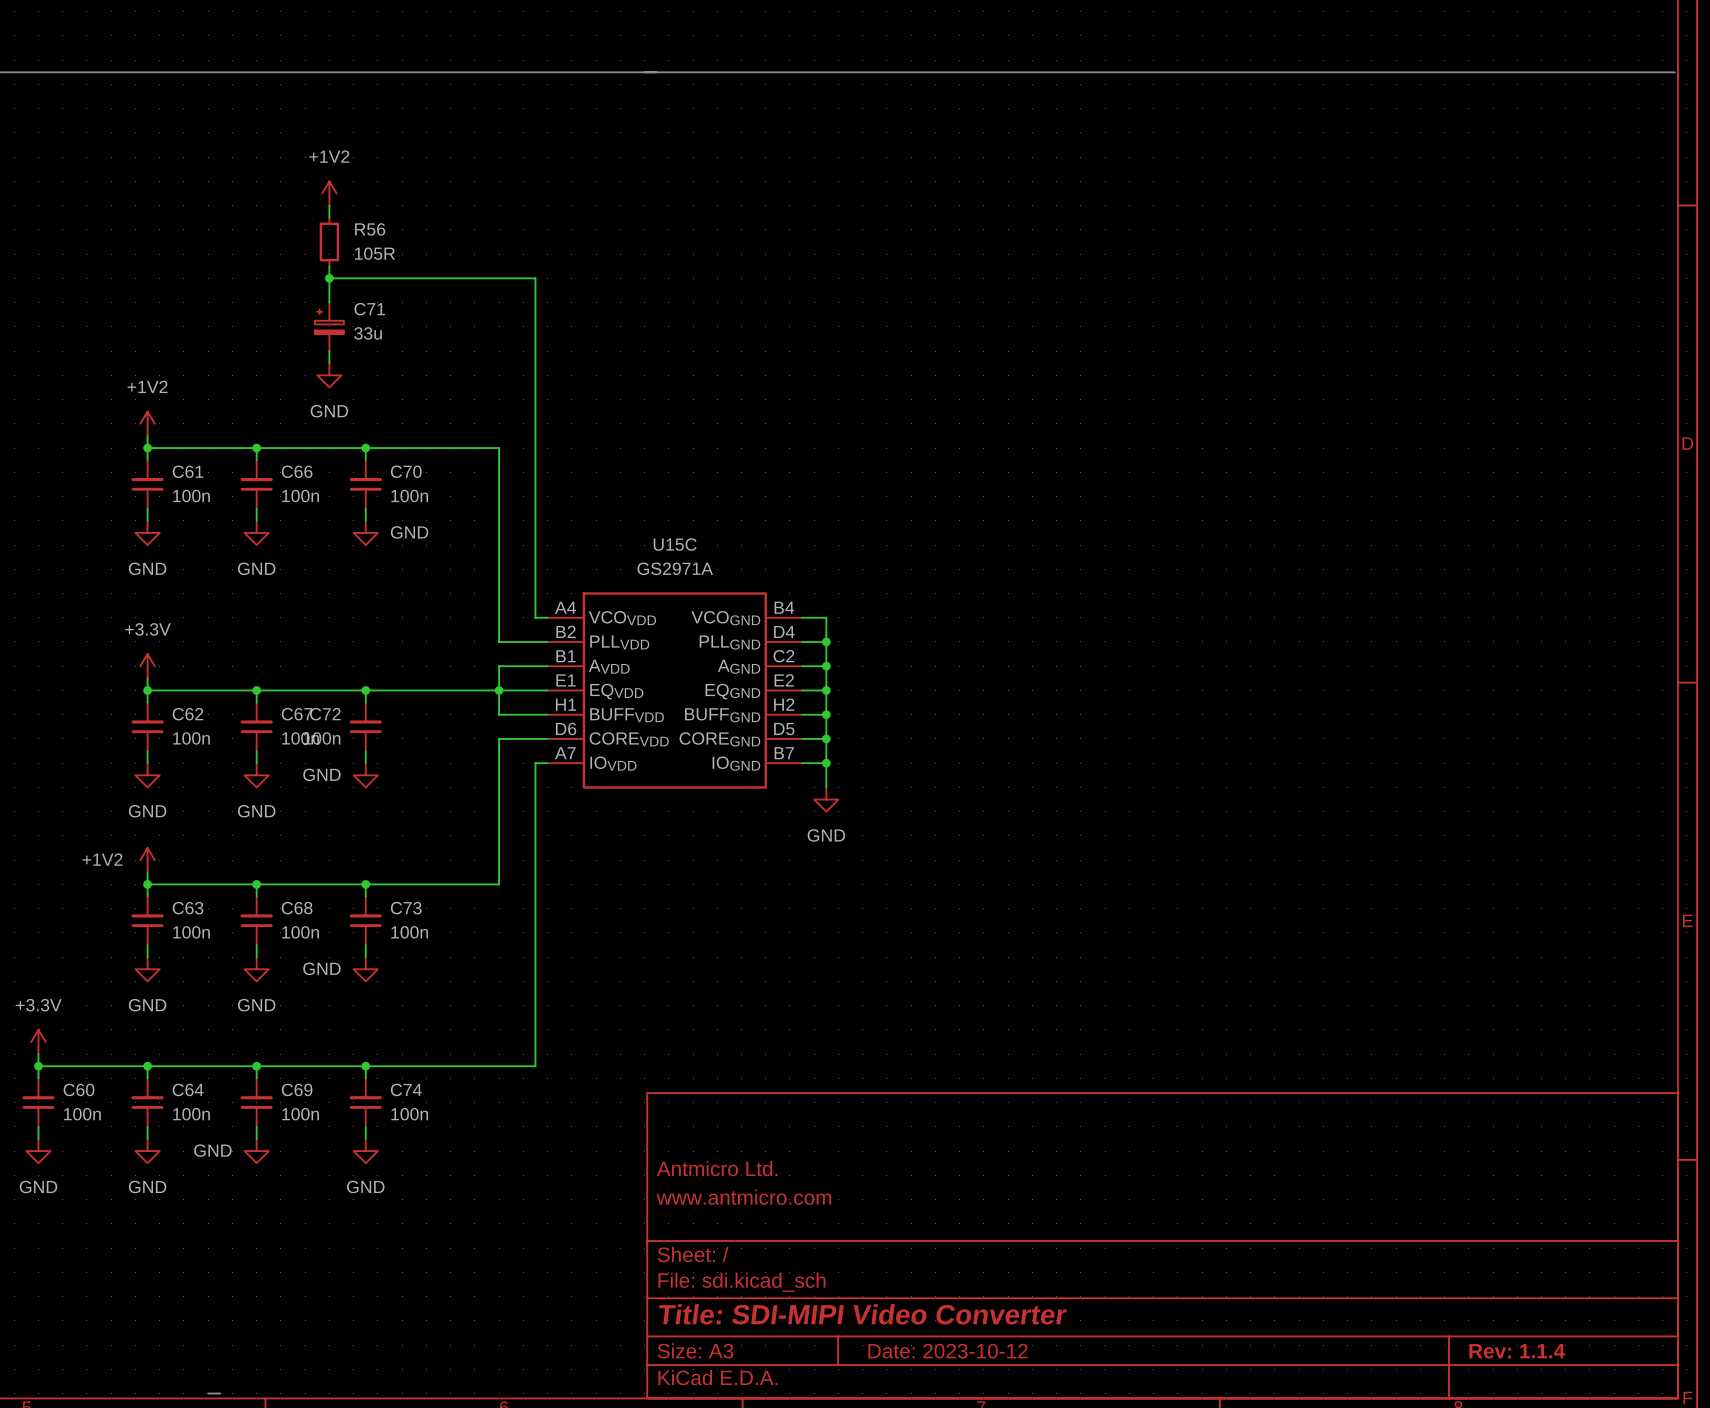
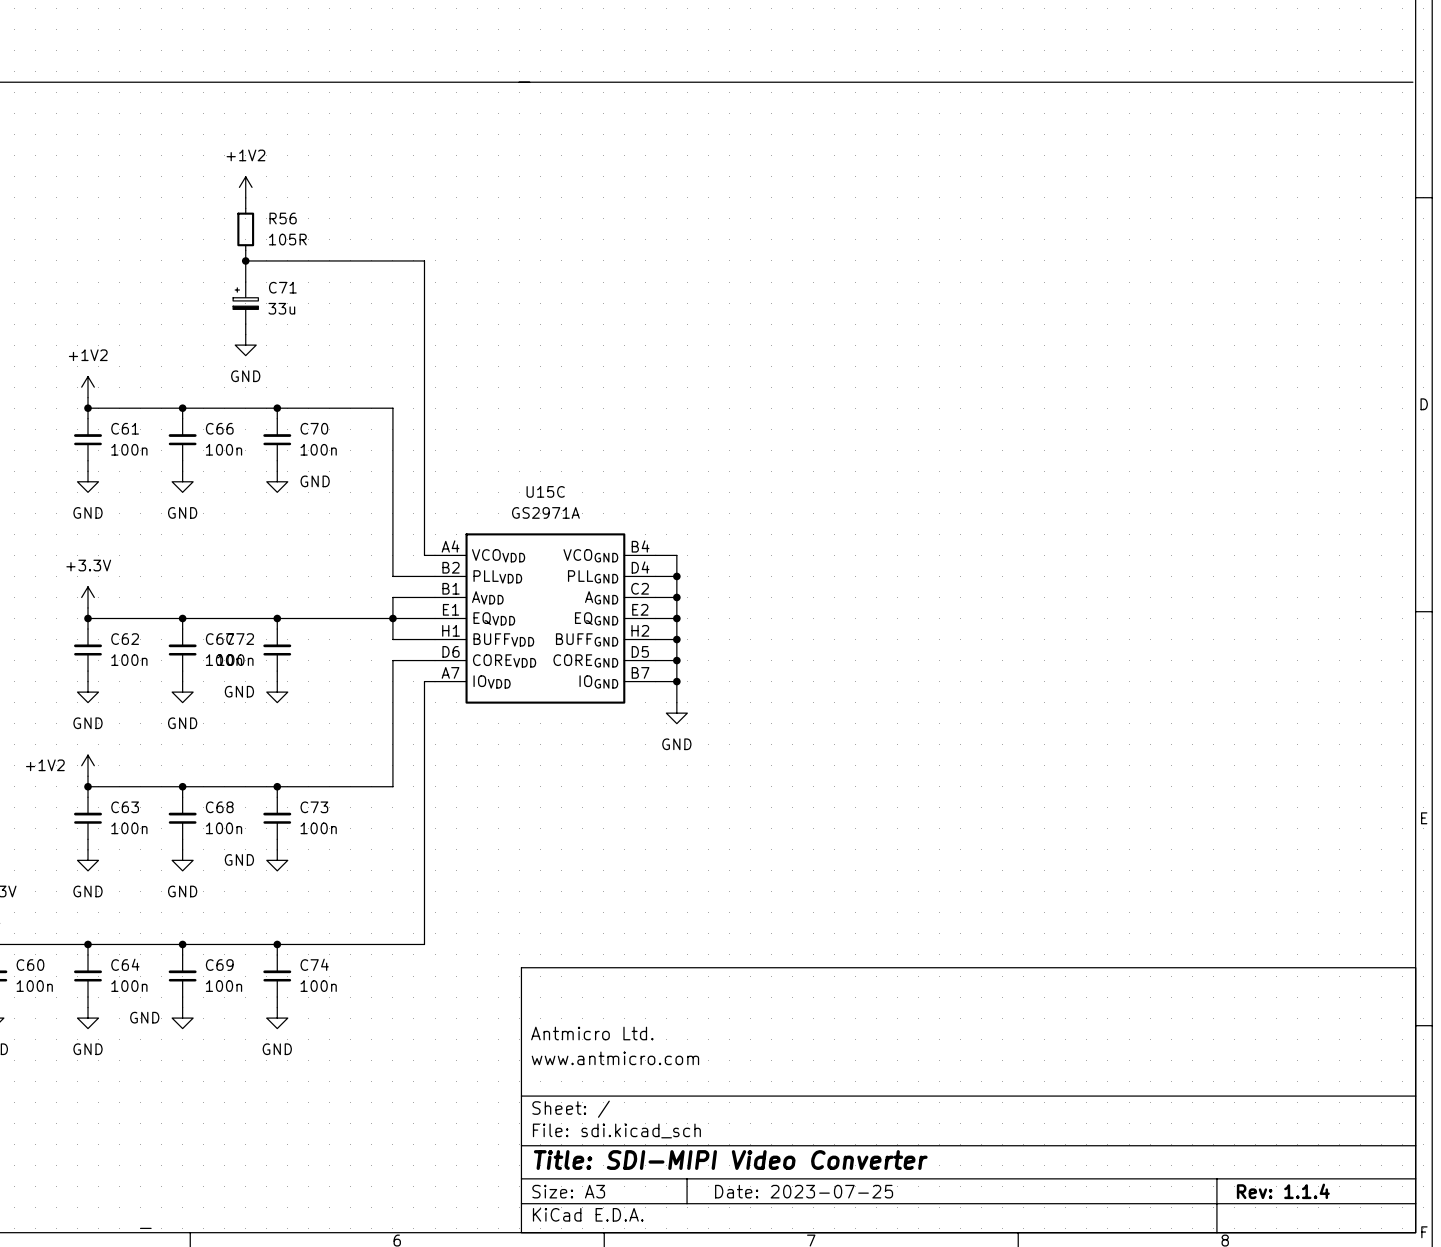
title block: Date: 2023-10-12 (948, 1351) -> Date: 2023-07-25 (804, 1191)

